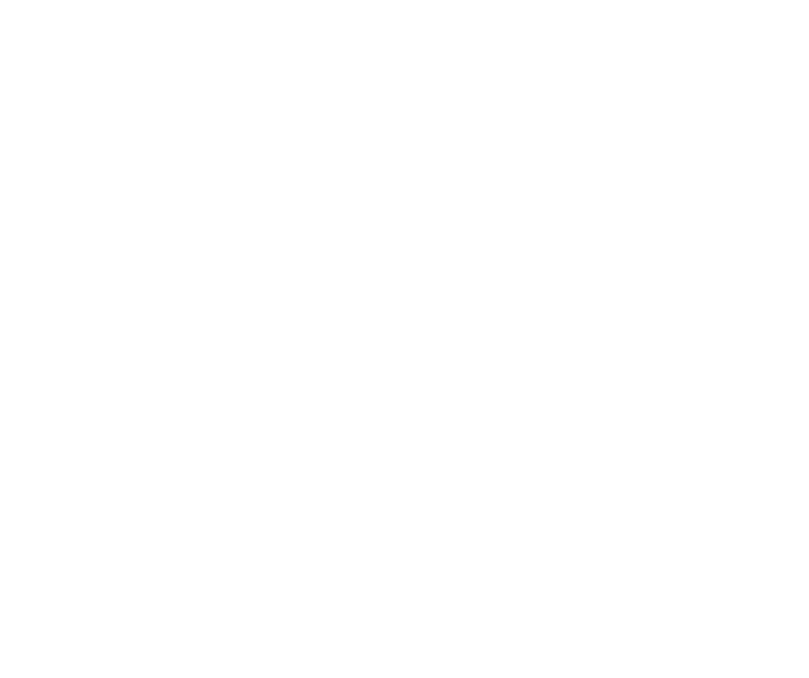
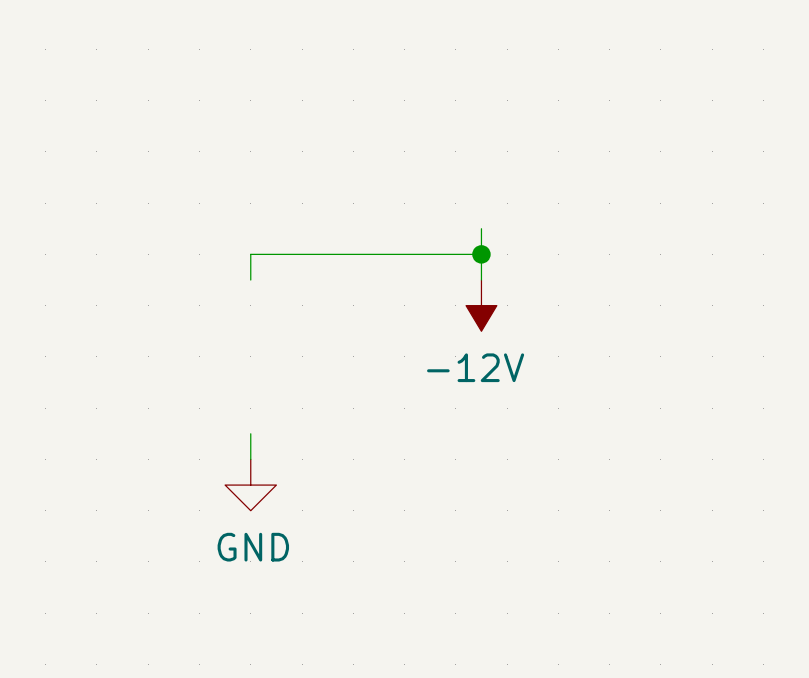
wire: none -> (481, 228) (481, 280)
wire: none -> (481, 254) (250, 254) (250, 280)
junction: none -> (481, 254)
power symbol: none -> -12V (481, 305)
wire: none -> (250, 433) (250, 459)
power symbol: none -> GND (250, 485)

